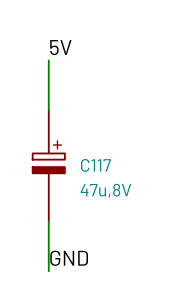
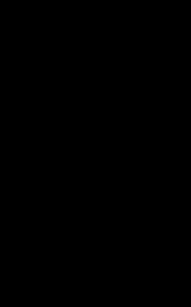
label: 5V (60, 47) -> none
wire: (48, 60) (48, 110) -> none
C117: 47u,8V (48, 165) -> none
wire: (48, 221) (48, 271) -> none
label: GND (69, 258) -> none

